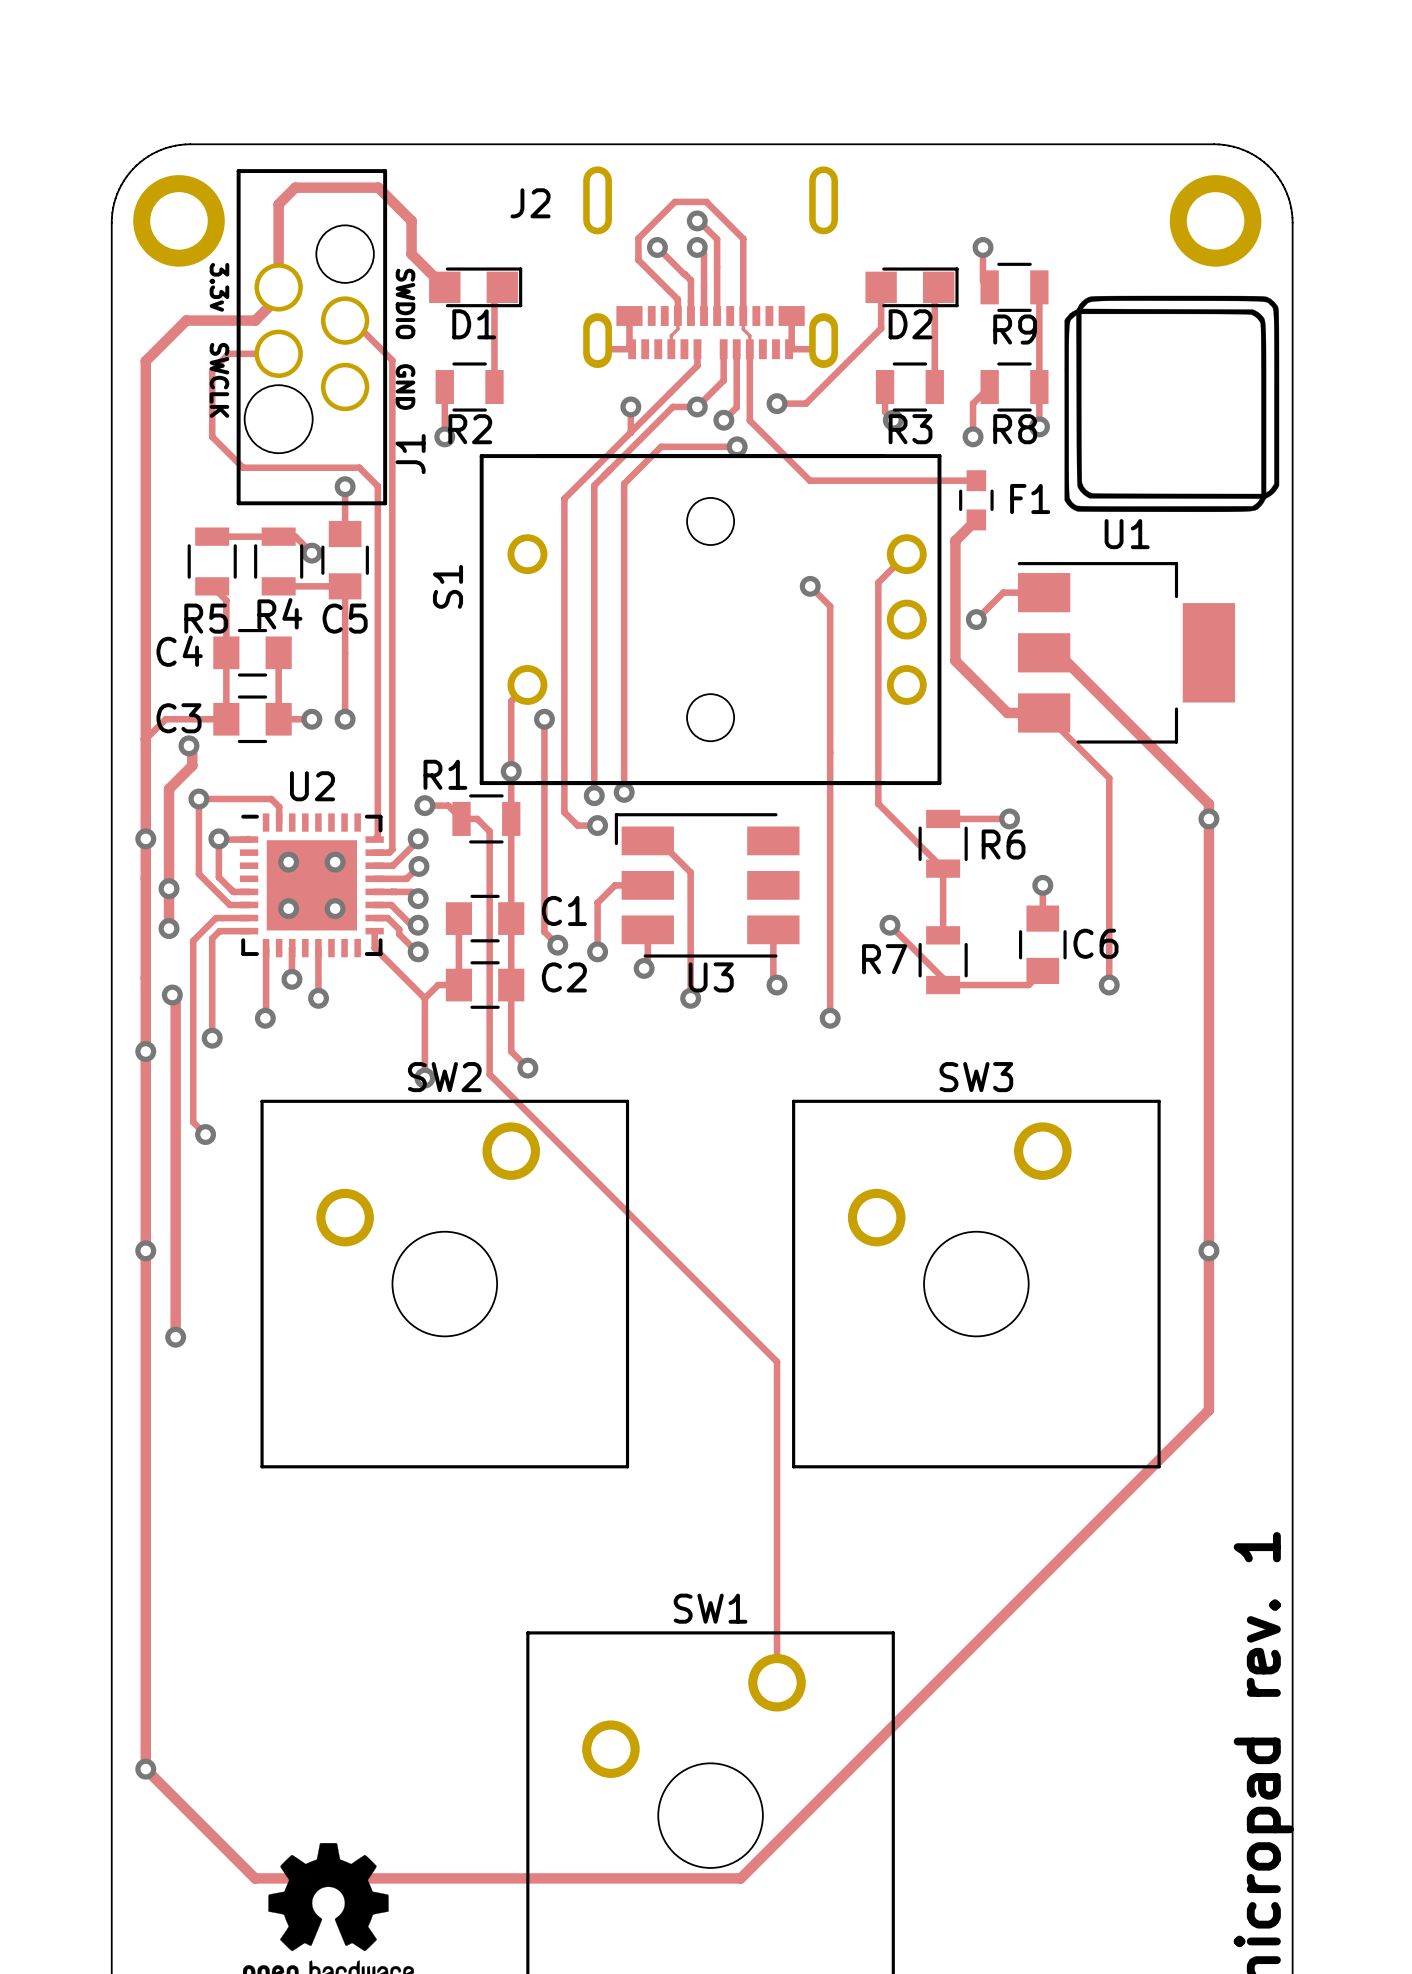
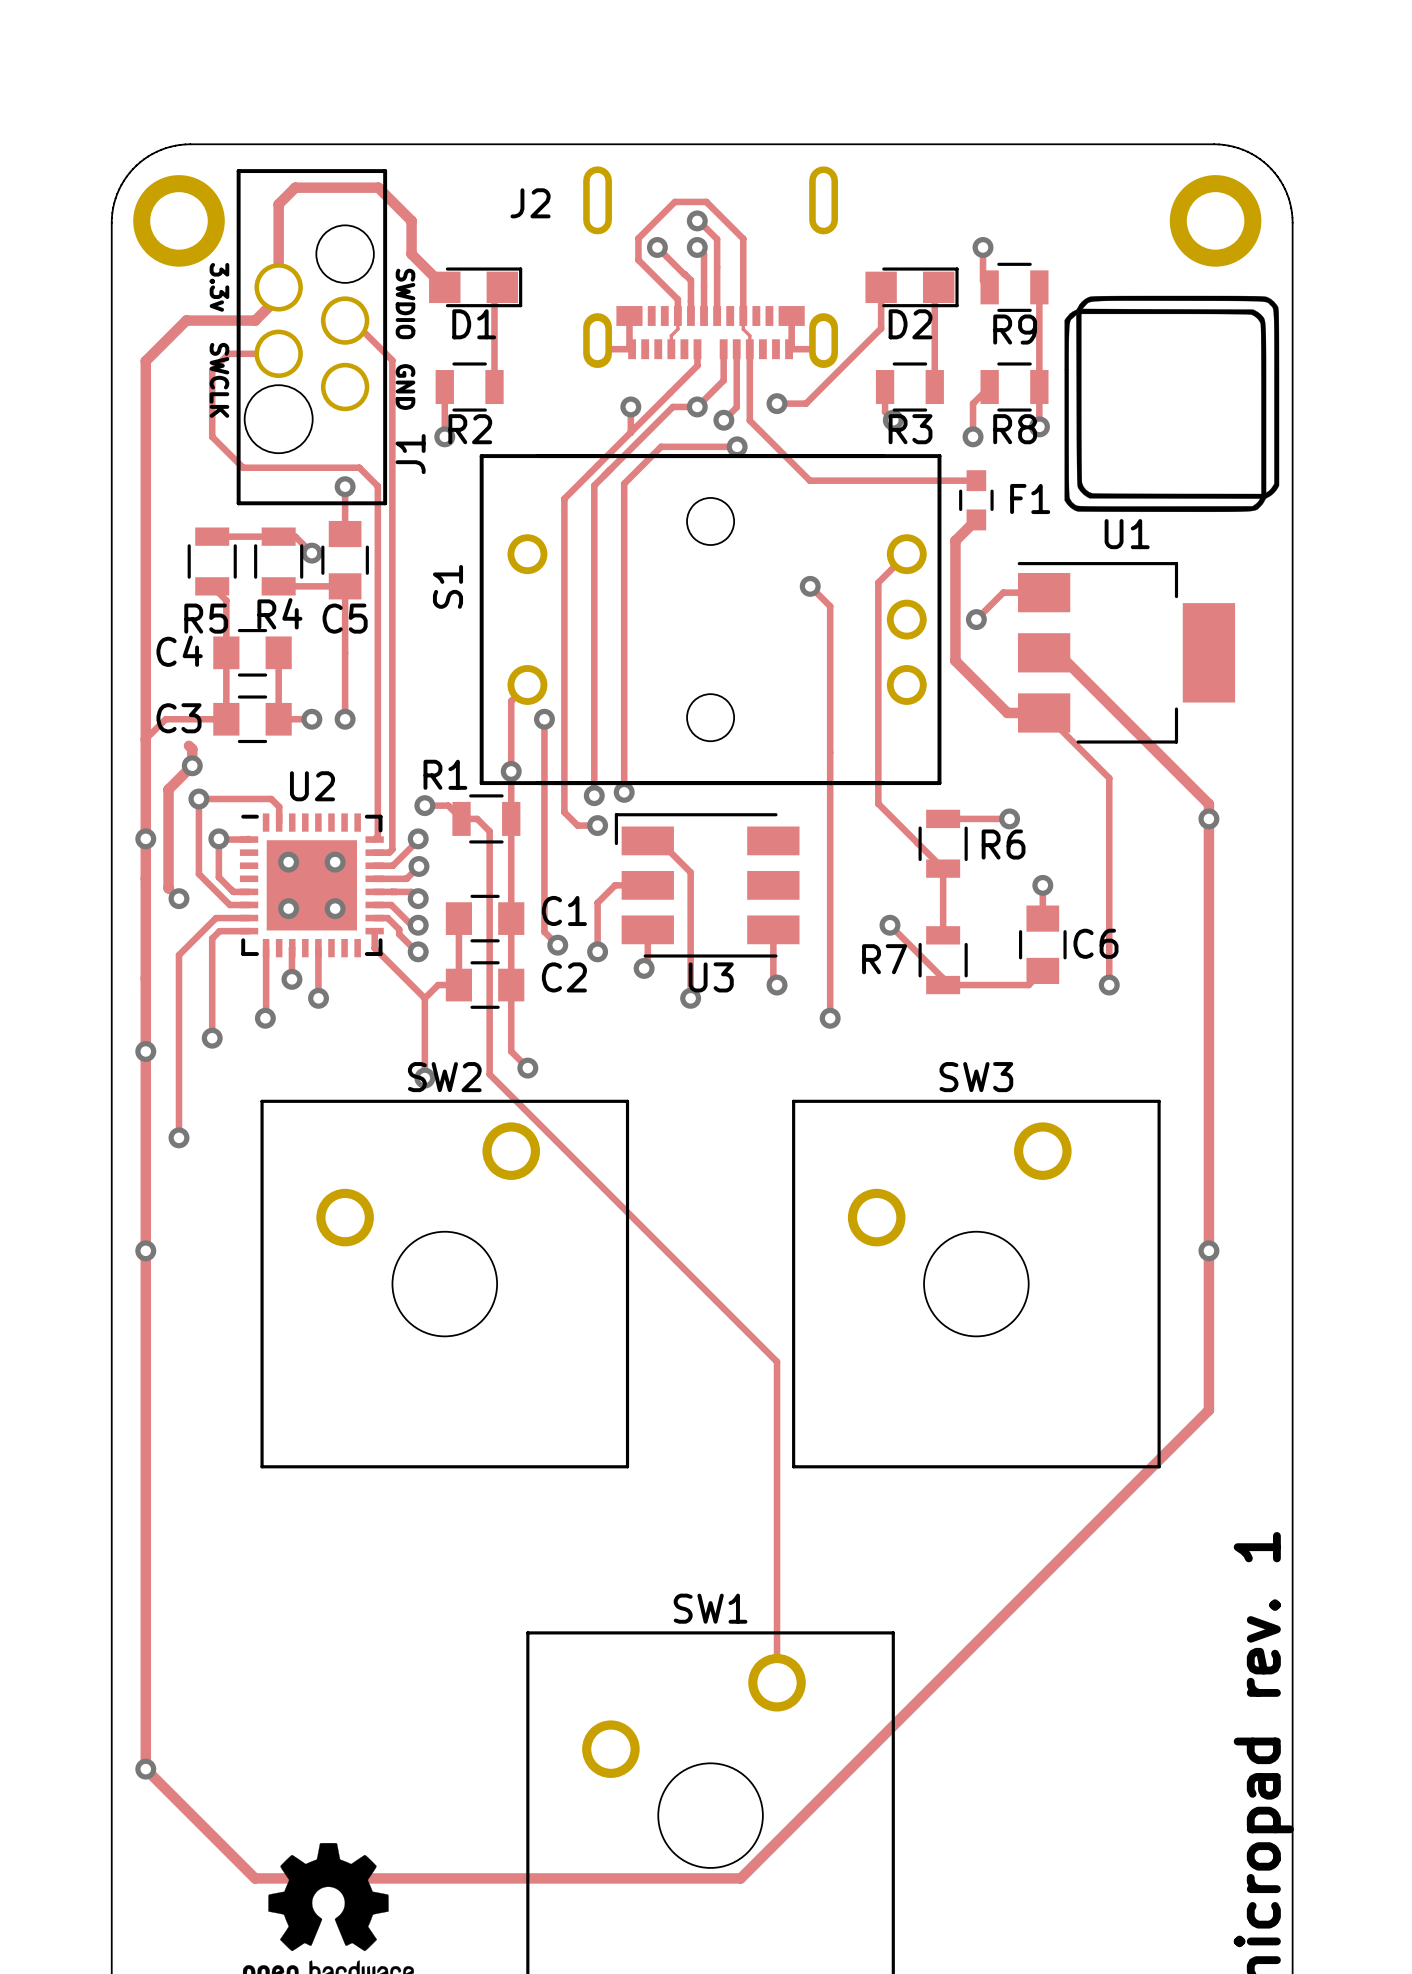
via position: (188, 745) -> (192, 765)
track: (169, 789) (169, 928) -> (169, 789) (168, 888)
via position: (169, 888) -> (178, 898)
via: (169, 928) -> none
track: (193, 940) (193, 1122) (205, 1134) -> (193, 940) (178, 955) (178, 1137)
track: (172, 995) (175, 998) (175, 1337) -> none
via: (172, 995) -> none
via position: (205, 1134) -> (178, 1137)
via: (175, 1337) -> none

